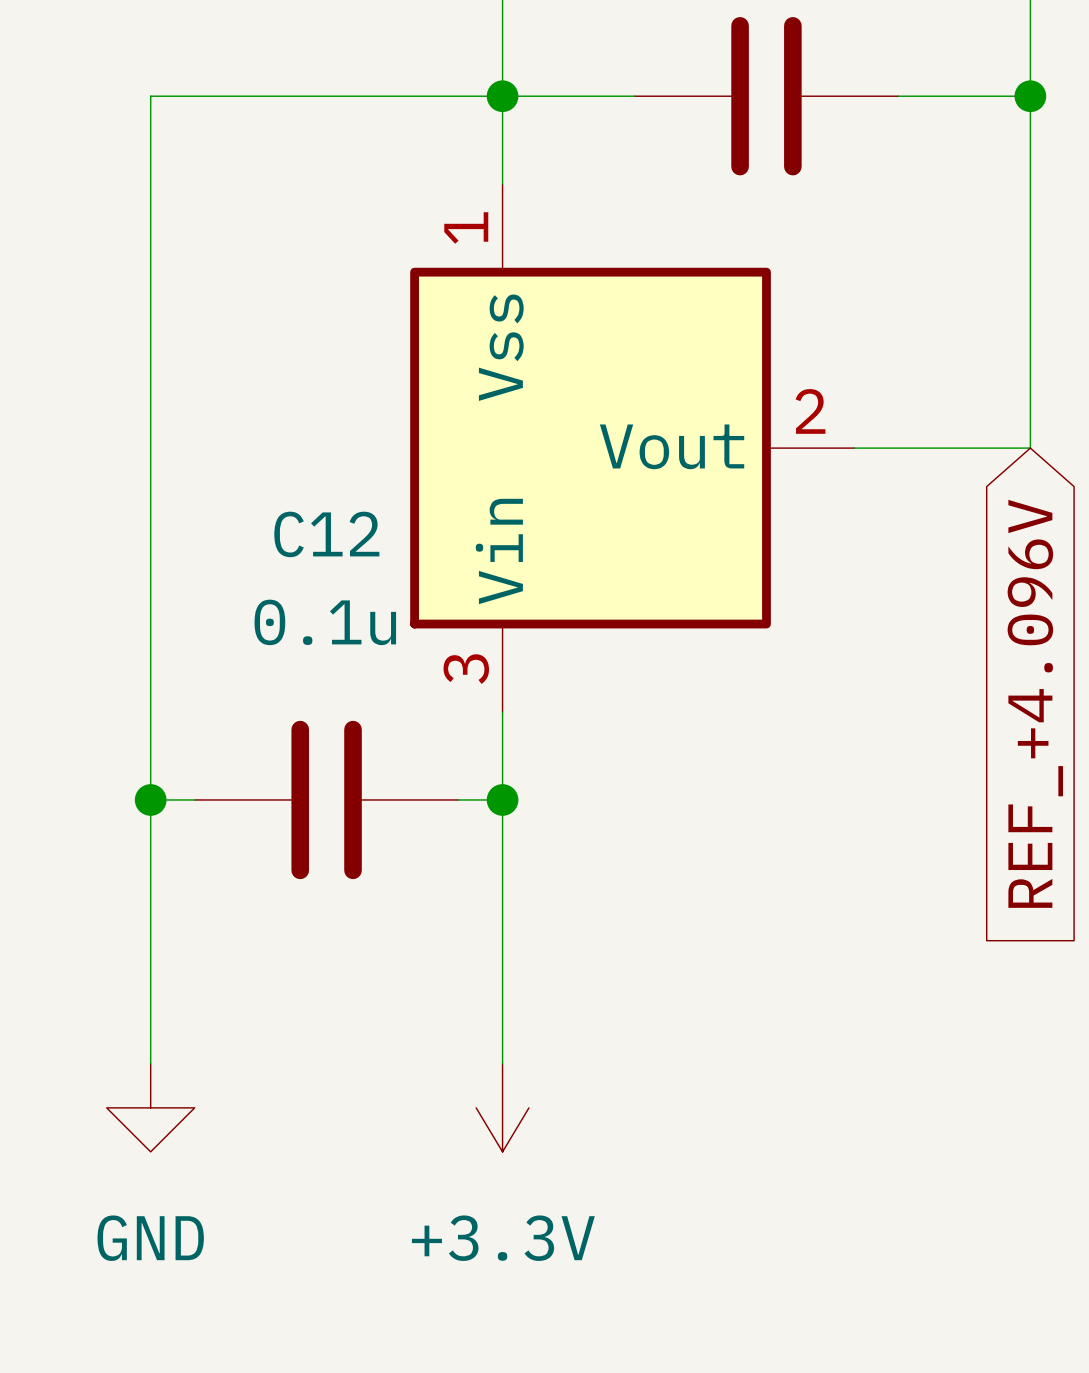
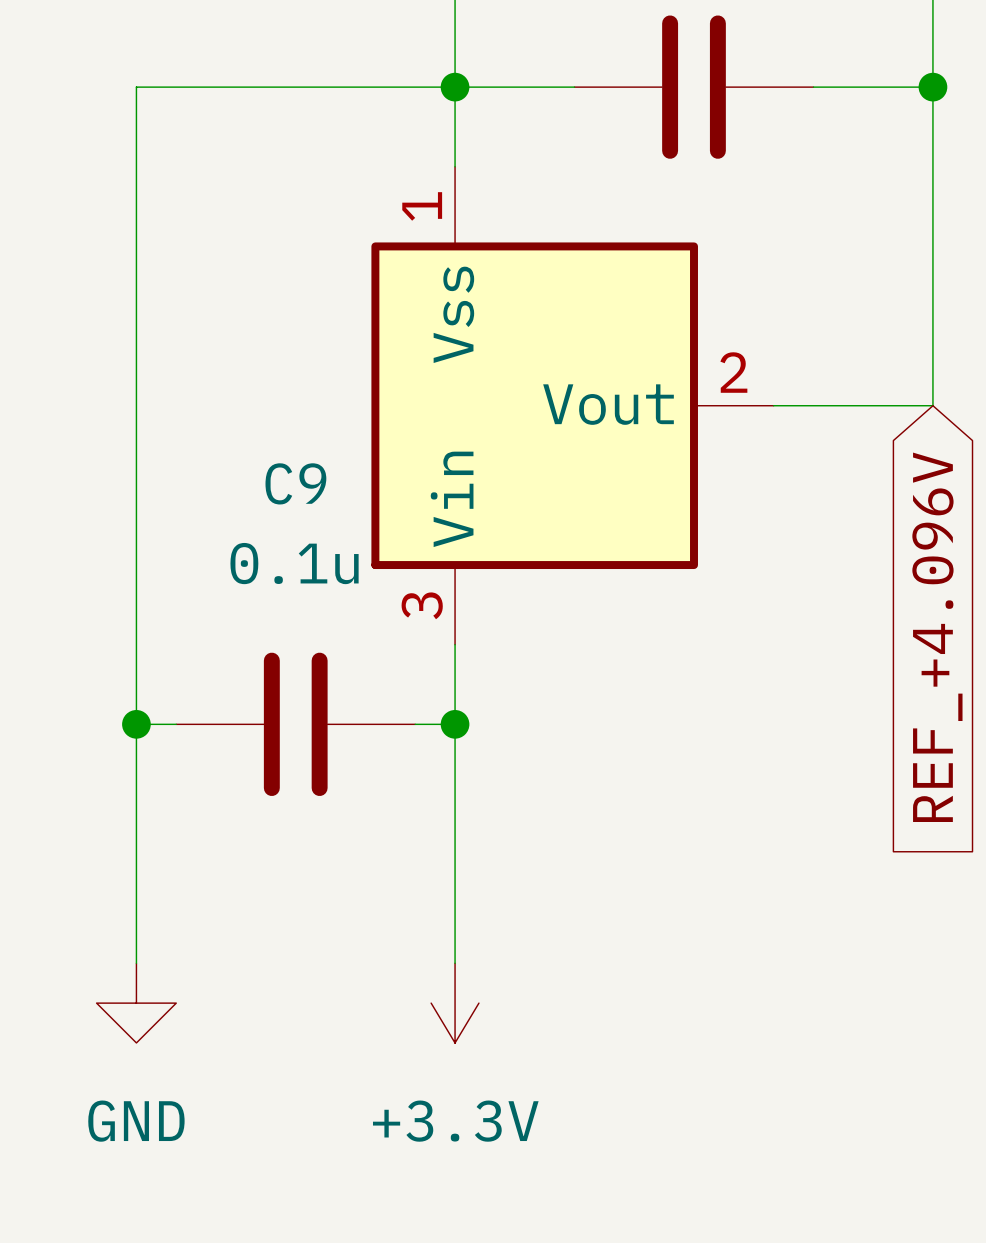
C12 name: C12 (326, 534) -> C9 (295, 483)

